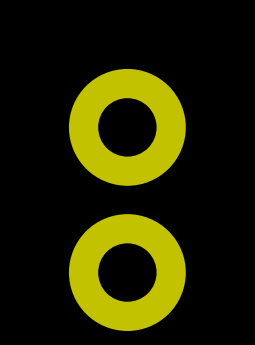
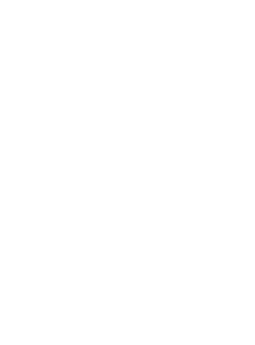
part: (127, 127) -> none
part: (127, 272) -> none

